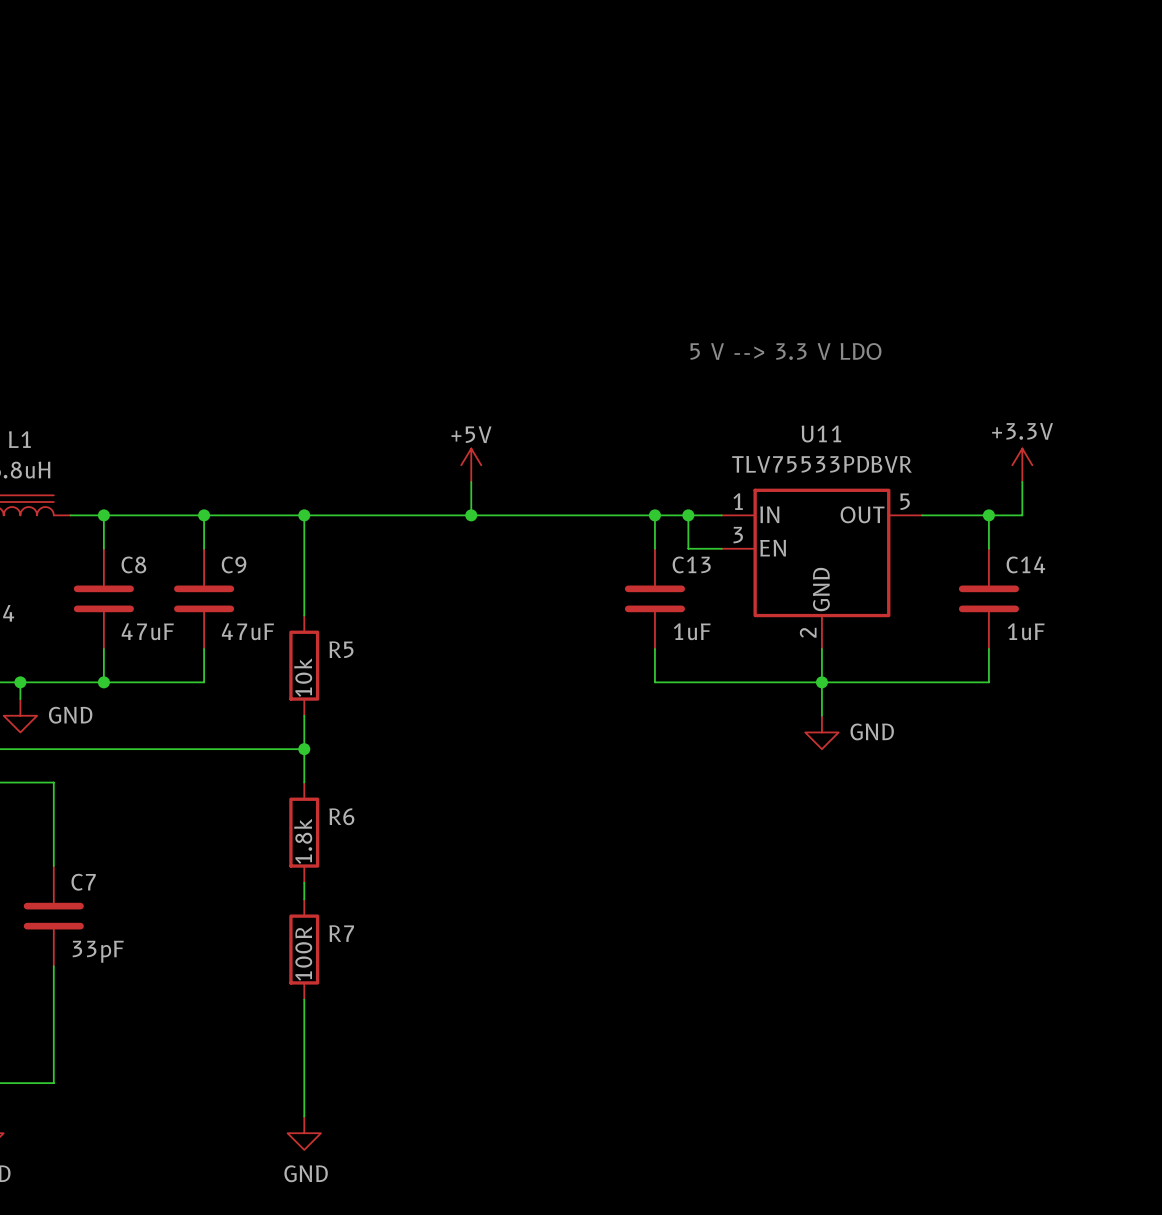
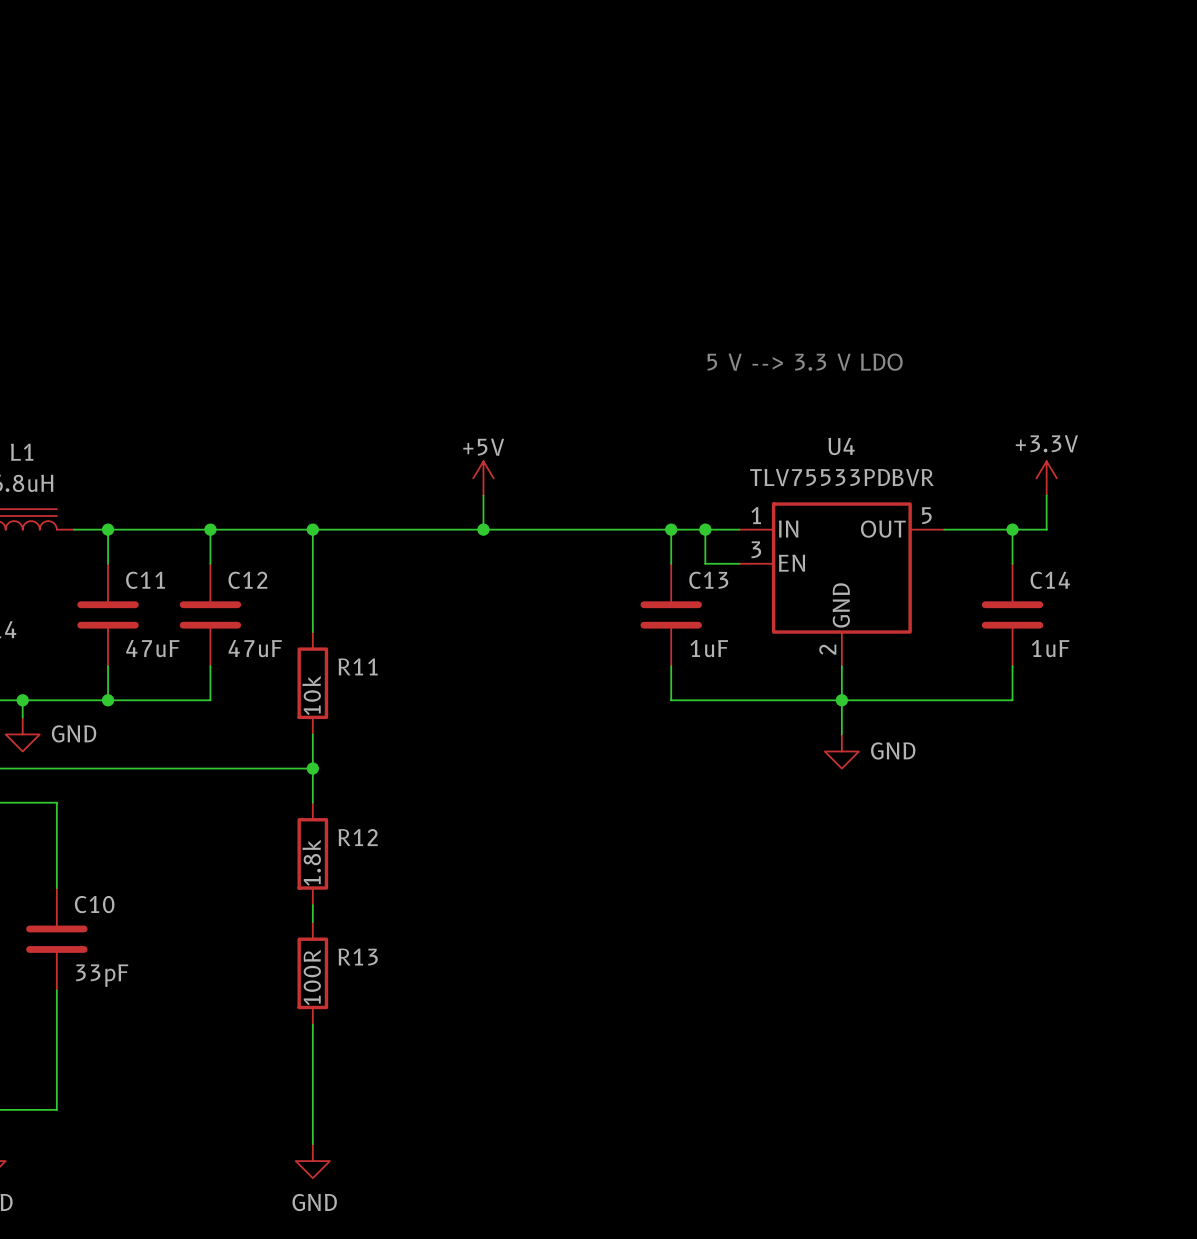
U11 name: U11 (821, 434) -> U4 (841, 446)
C8 name: C8 (133, 564) -> C11 (145, 580)
C9 name: C9 (234, 564) -> C12 (247, 580)
R5 name: R5 (341, 649) -> R11 (358, 666)
R6 name: R6 (341, 816) -> R12 (358, 837)
C7 name: C7 (83, 882) -> C10 (94, 904)
R7 name: R7 (341, 933) -> R13 (358, 957)

